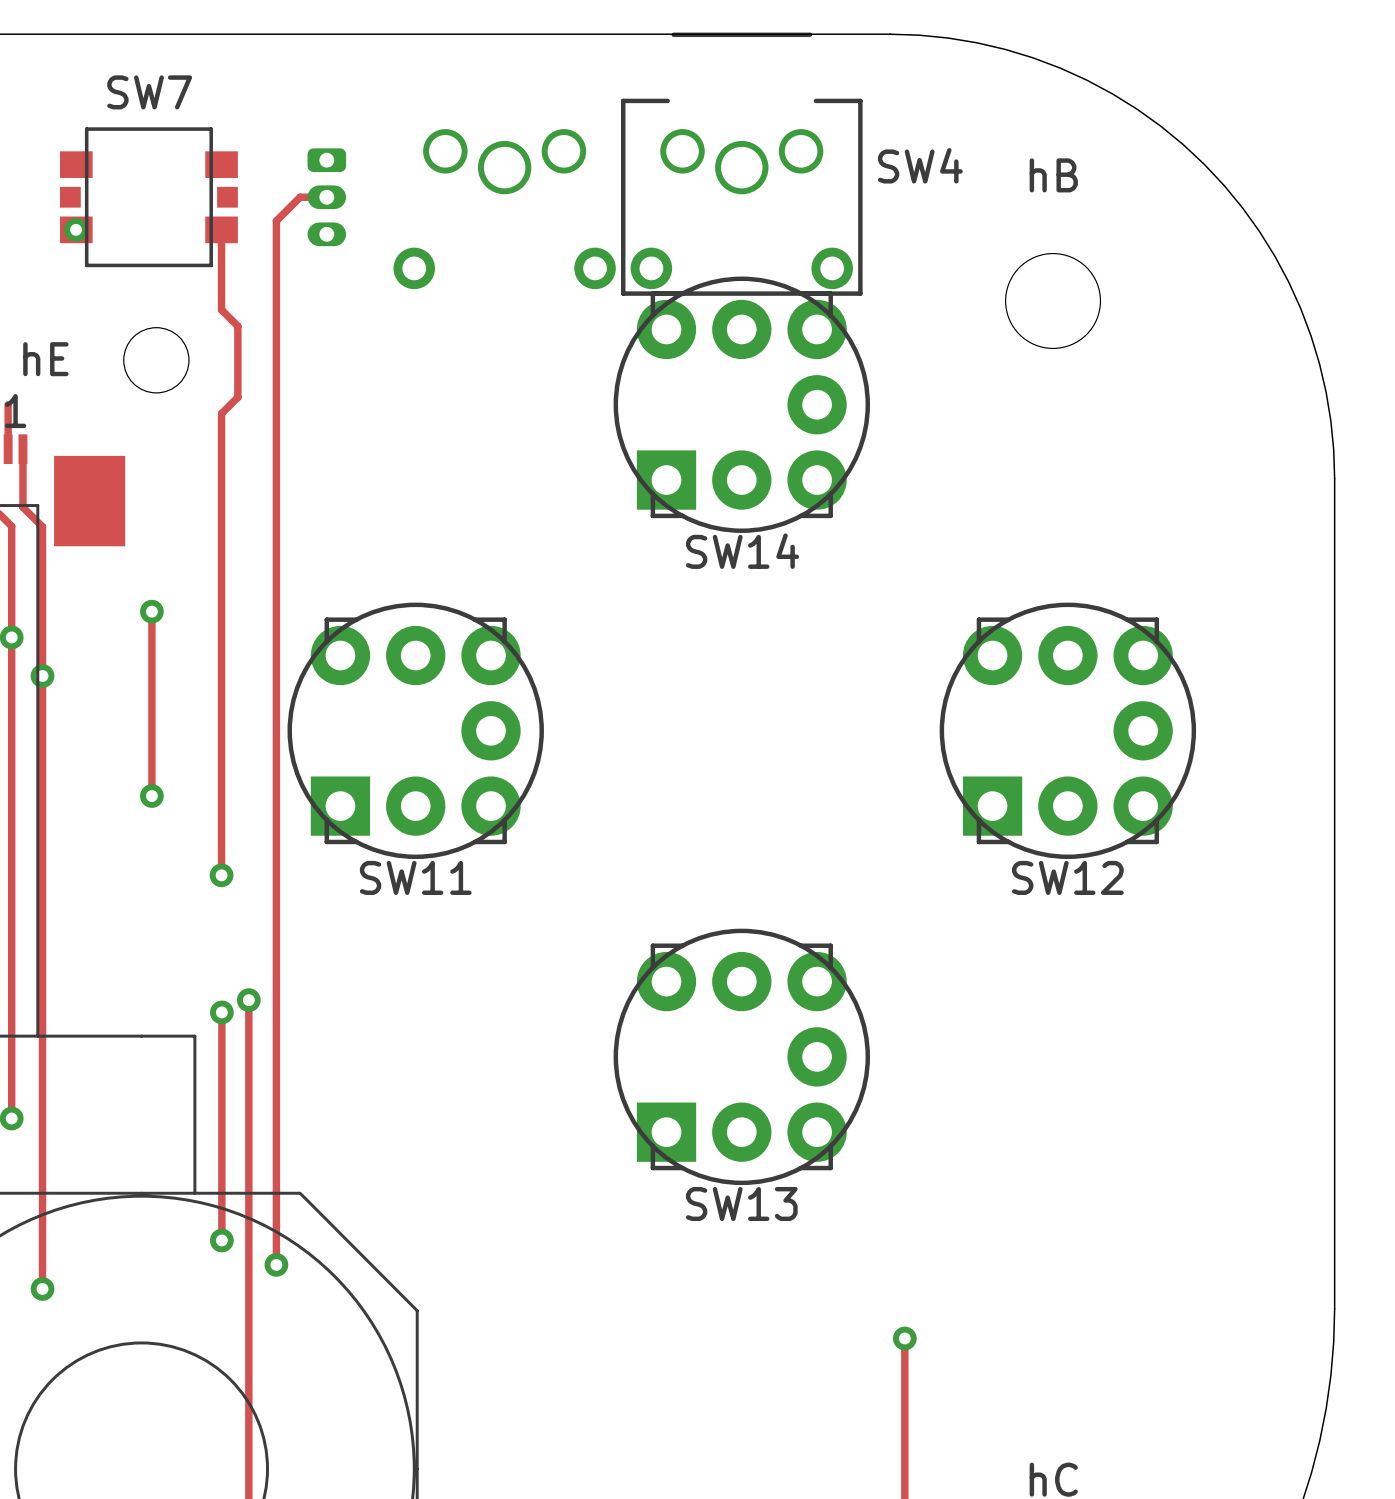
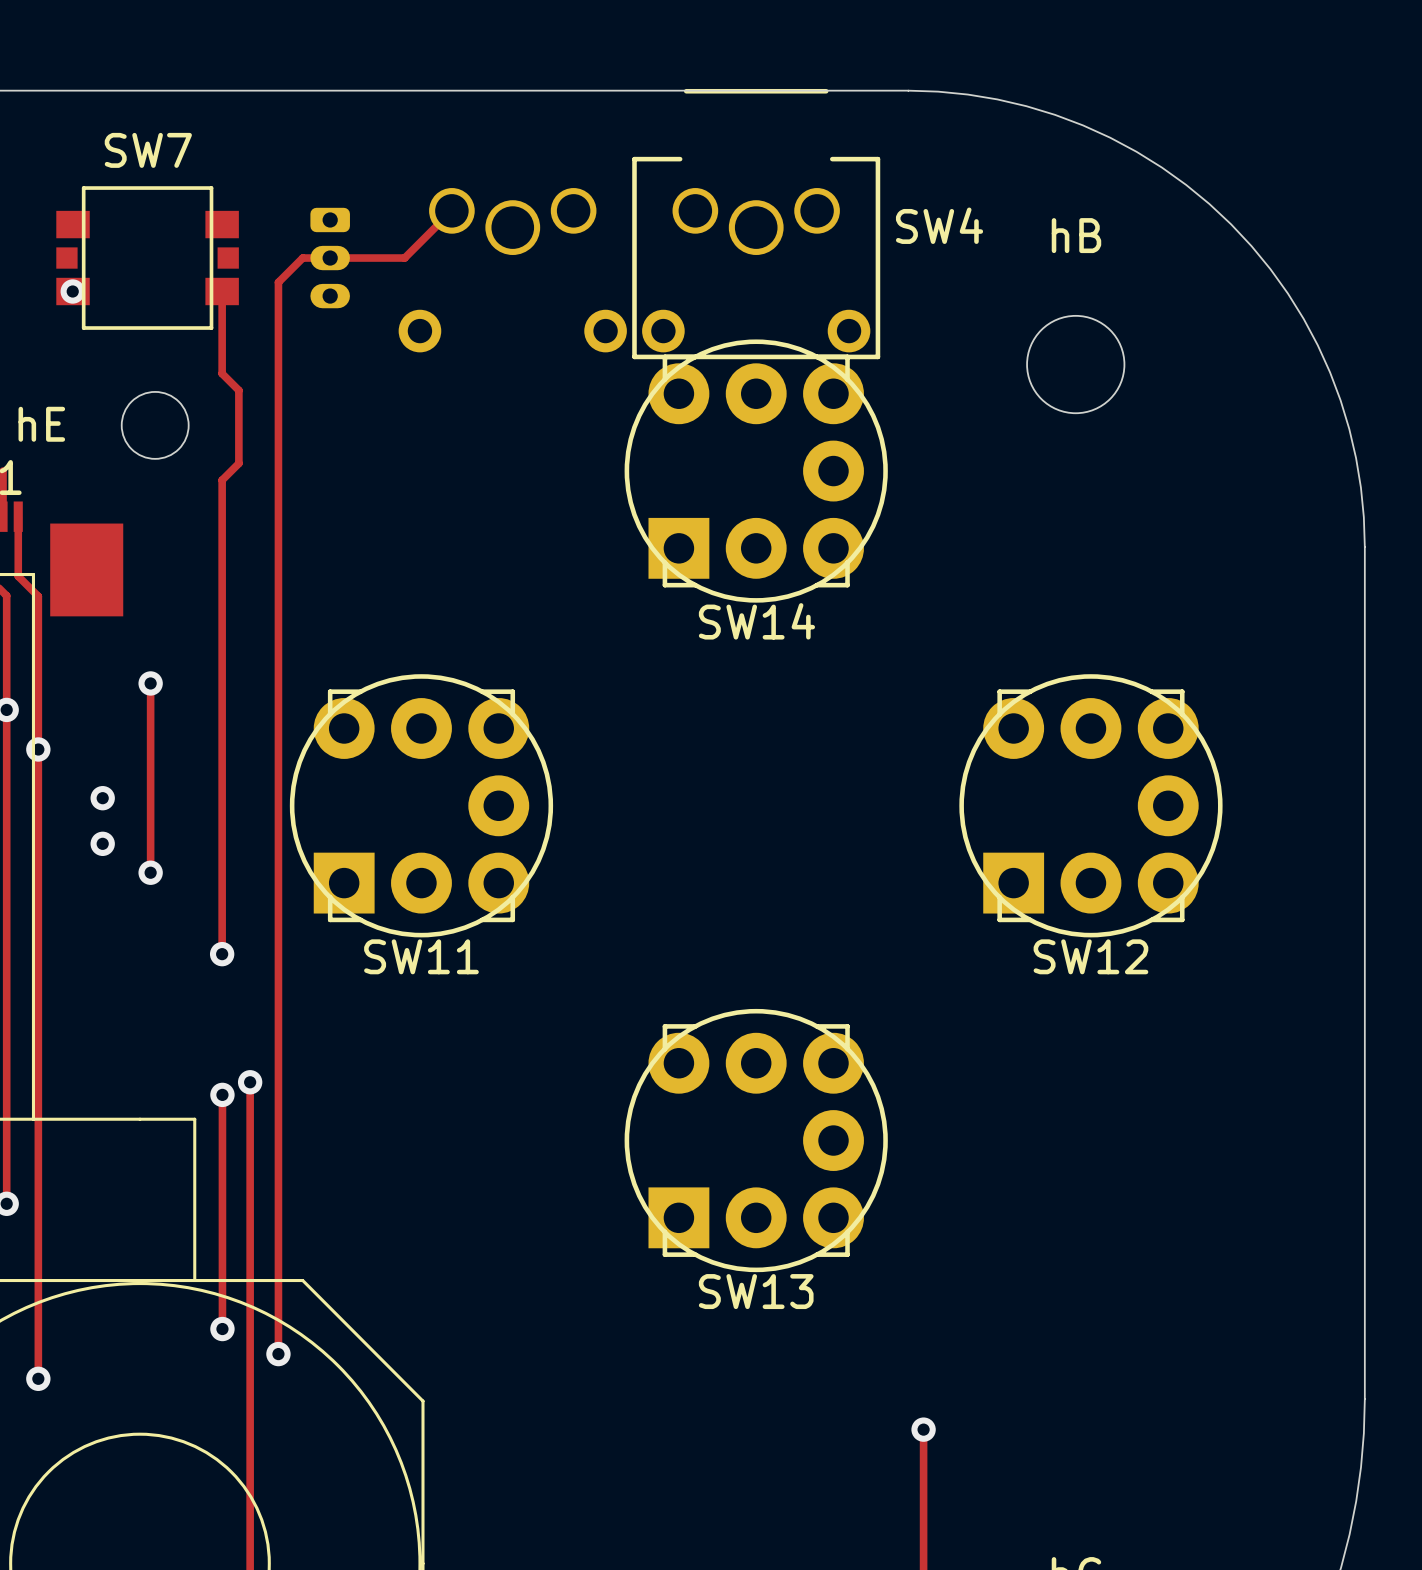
track: none -> (451, 210) (404, 258) (330, 258)
via: none -> (102, 798)
via: none -> (102, 843)

